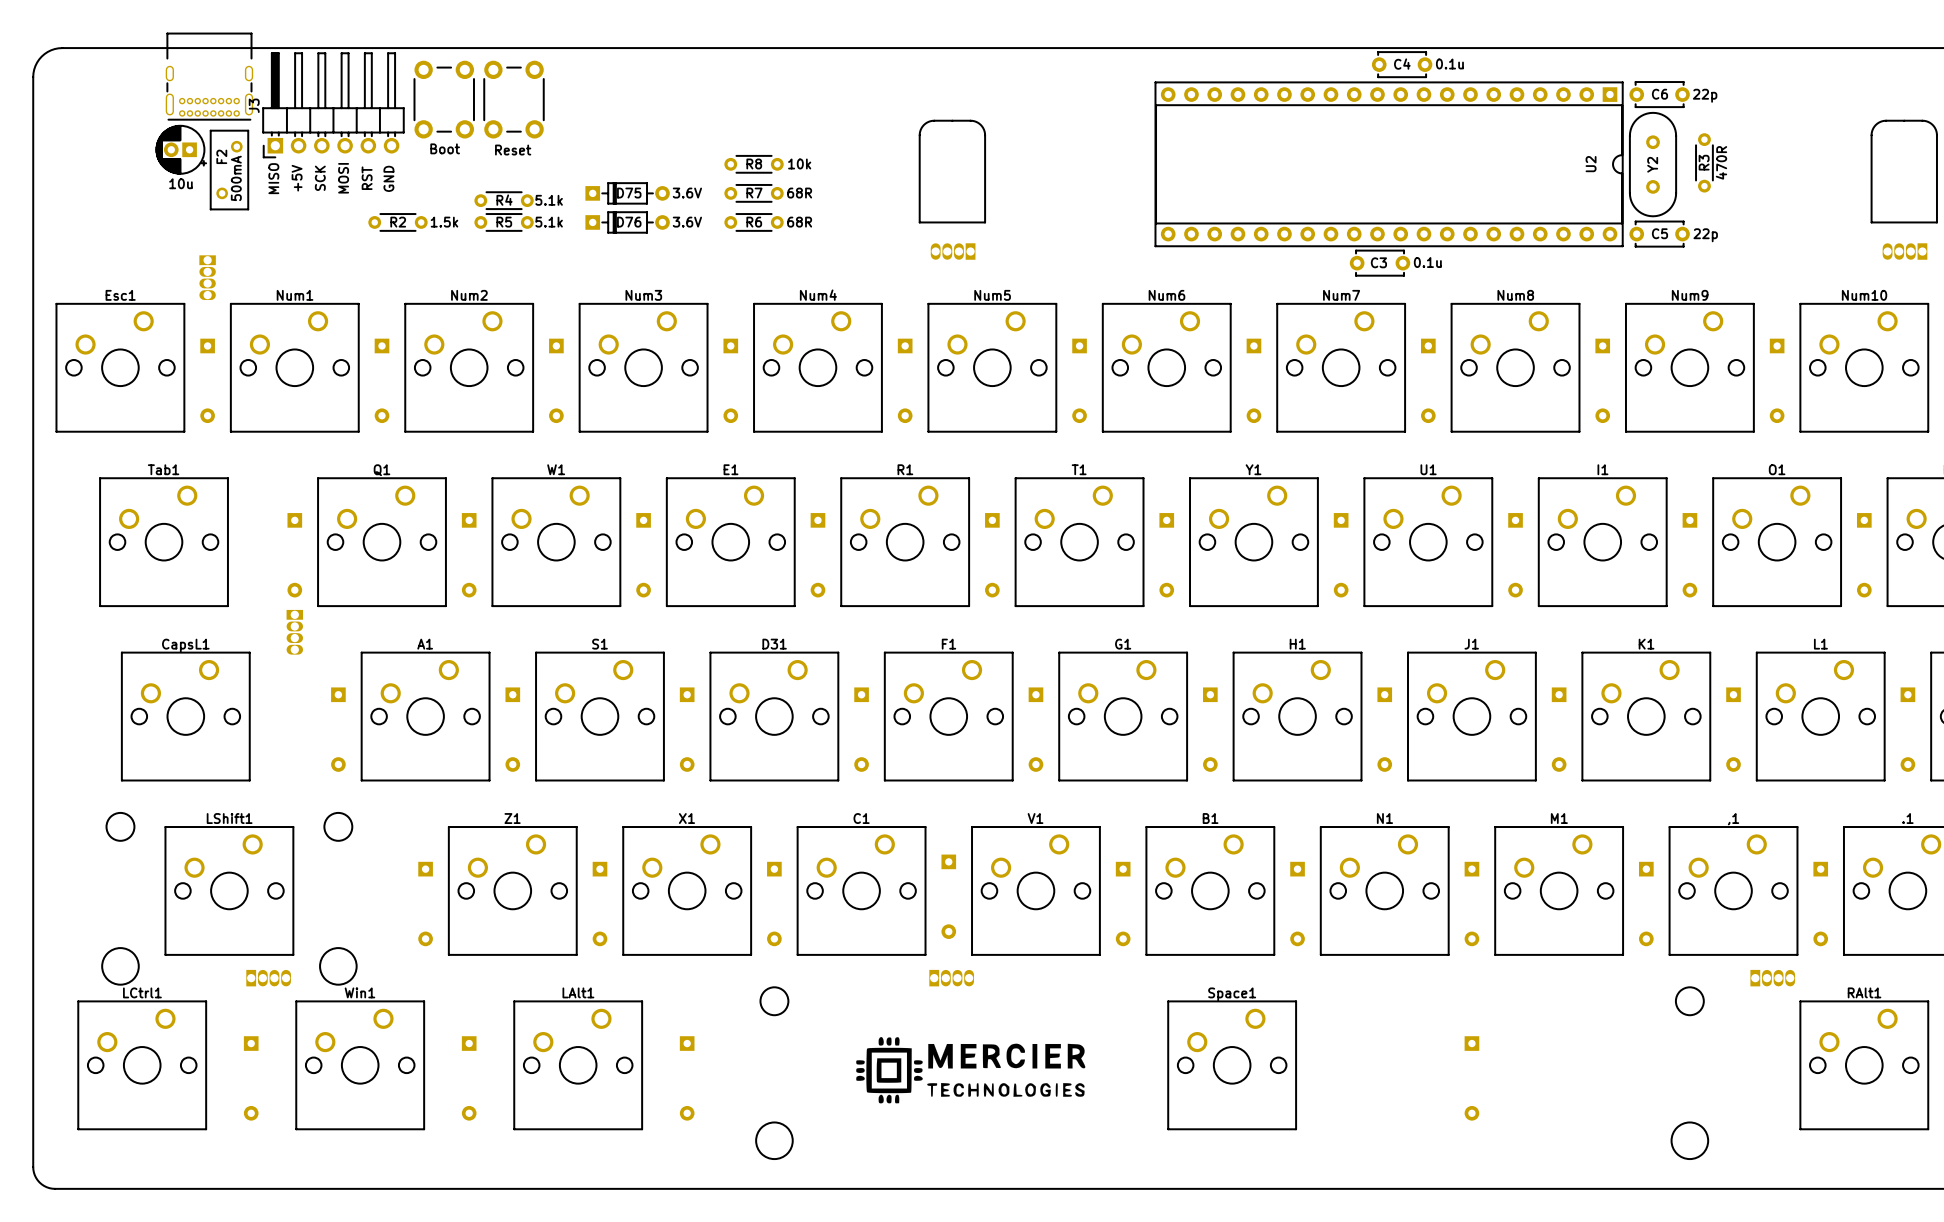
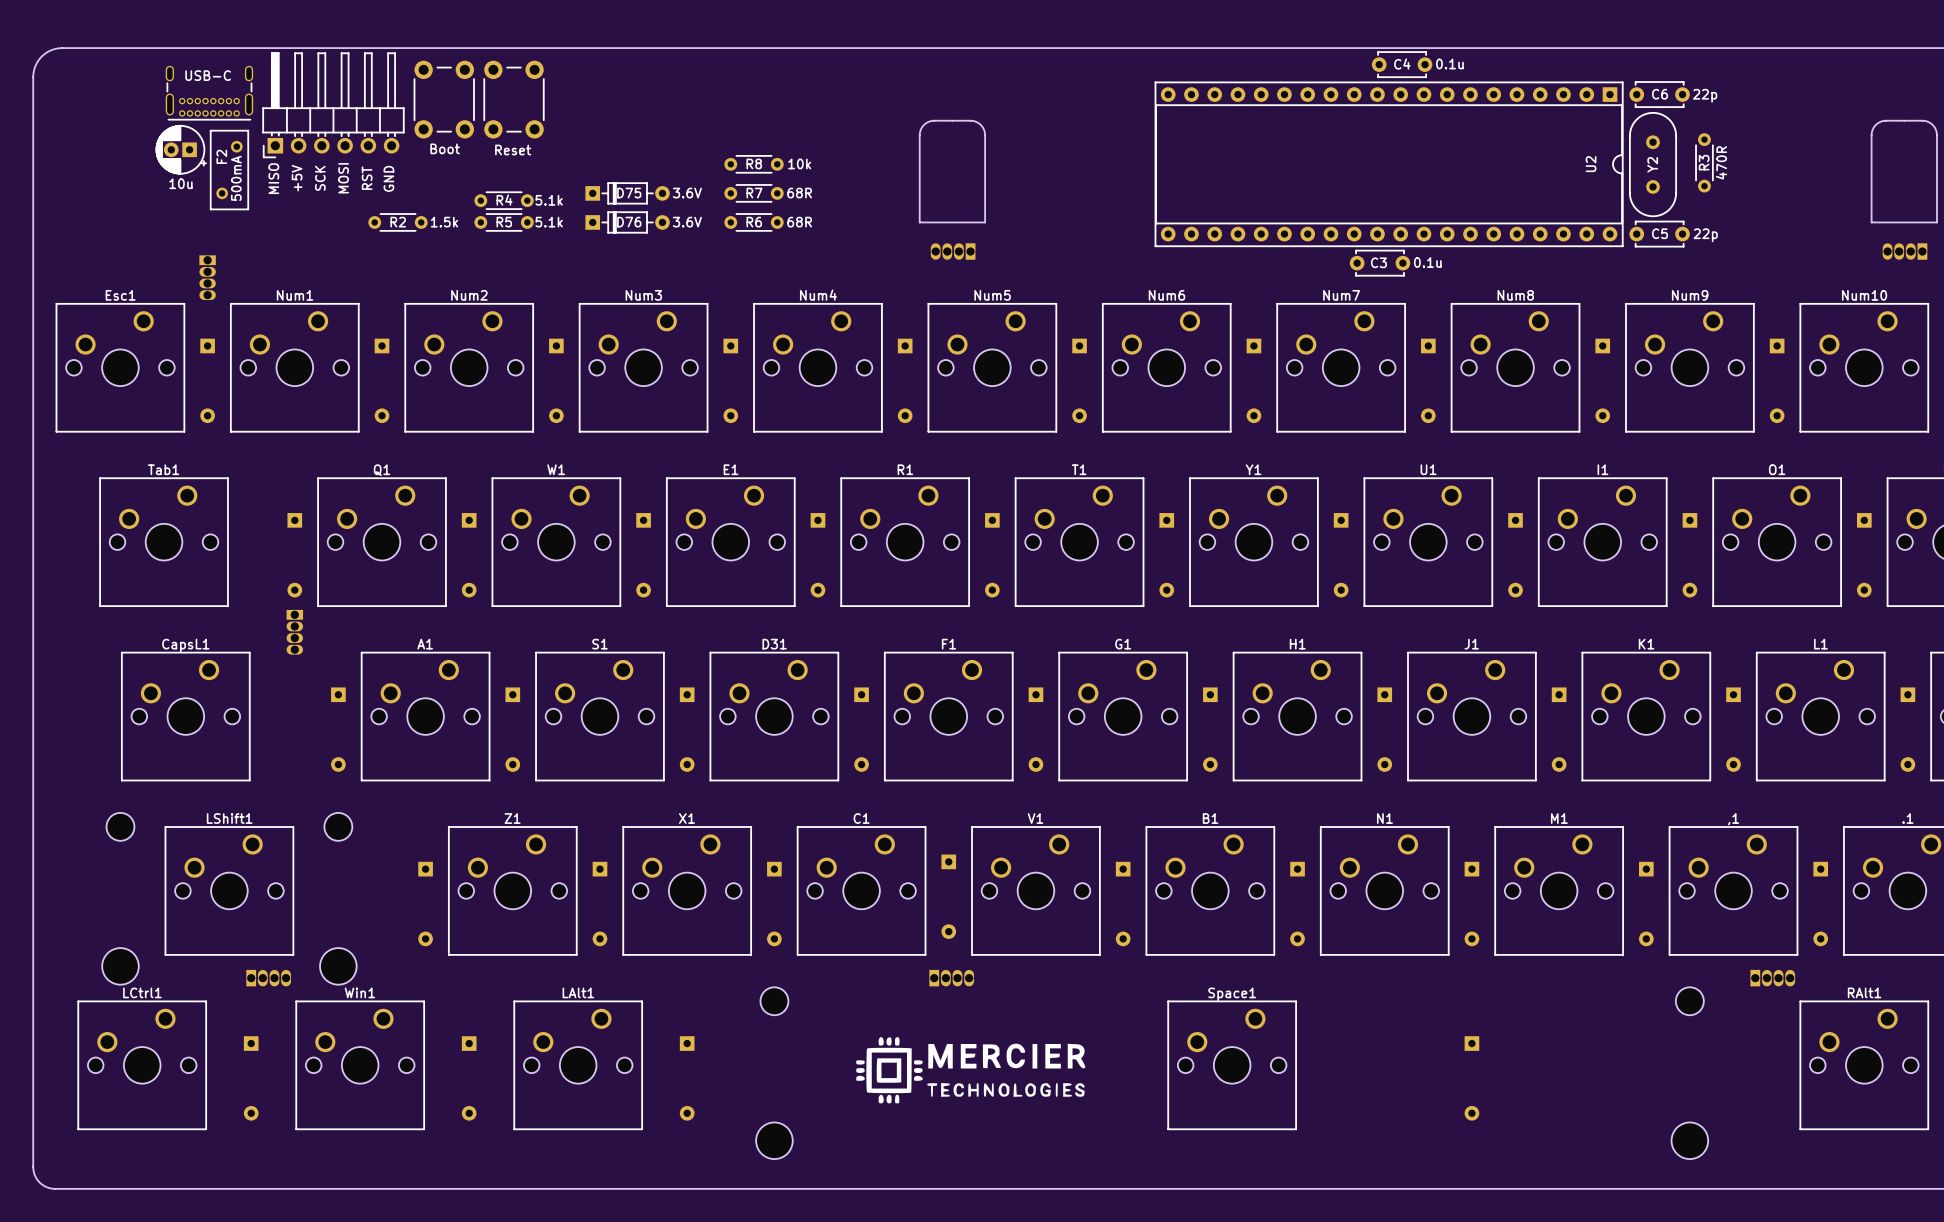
text: none -> USB-C (208, 75)
part: (209, 76) -> none
part: none -> (209, 93)
J3 name: J3 (254, 105) -> none

